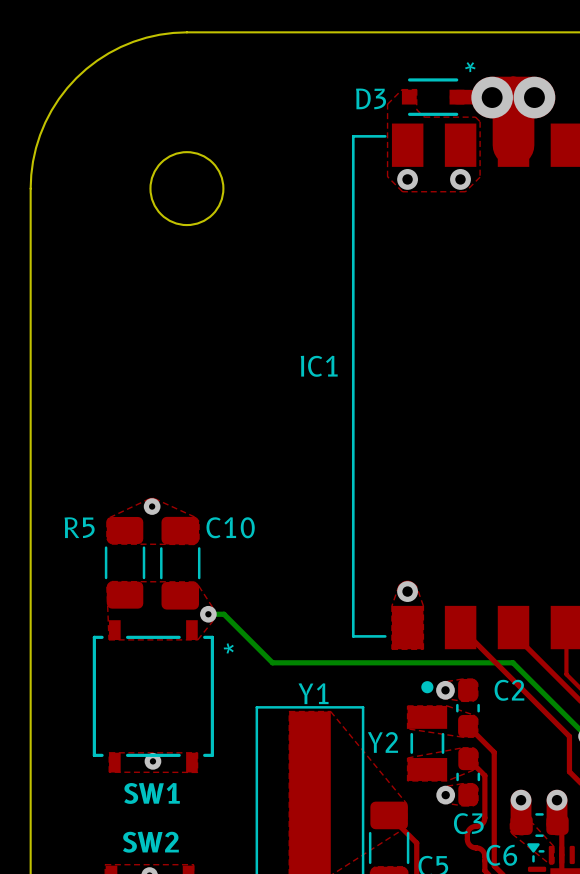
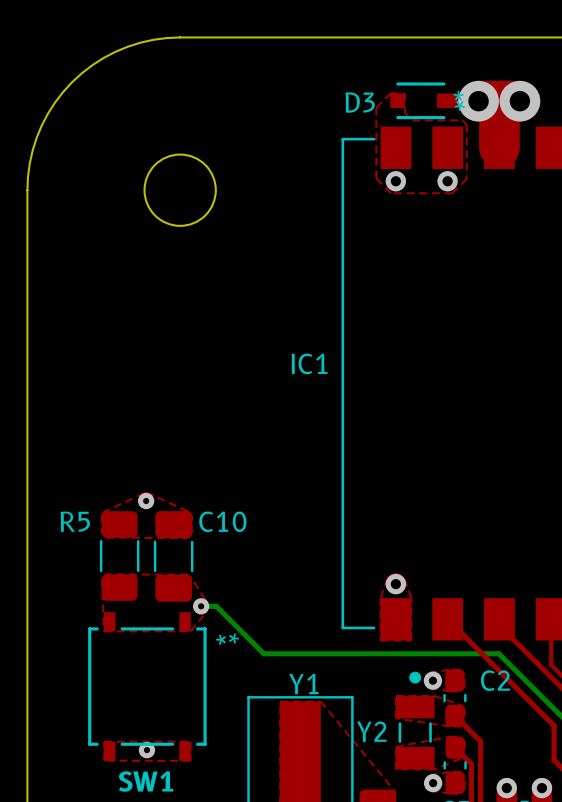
D3 footprint: [401, 78, 465, 116] -> [390, 82, 452, 120]
SW1 text: none -> * (233, 638)

